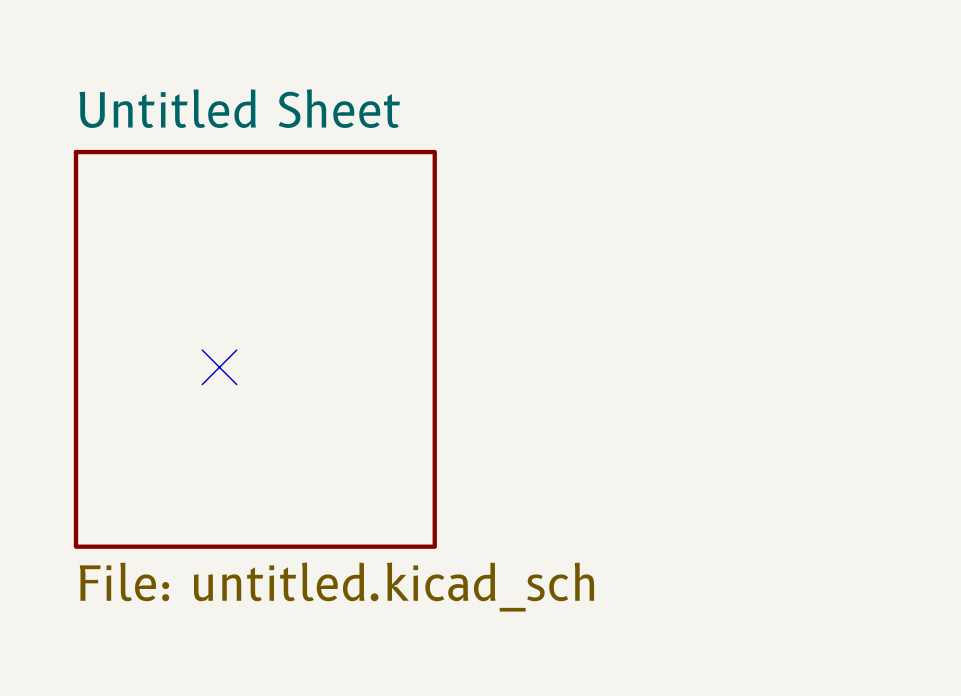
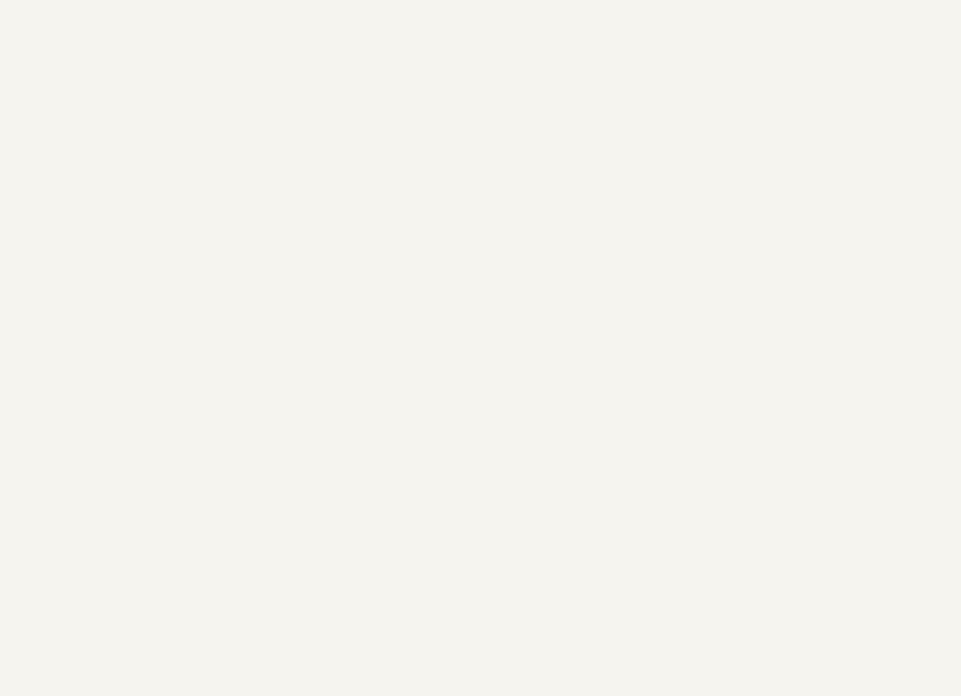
sheet Untitled Sheet: File: untitled.kicad_sch (255, 349) -> none
no-connect mark: (219, 367) -> none

